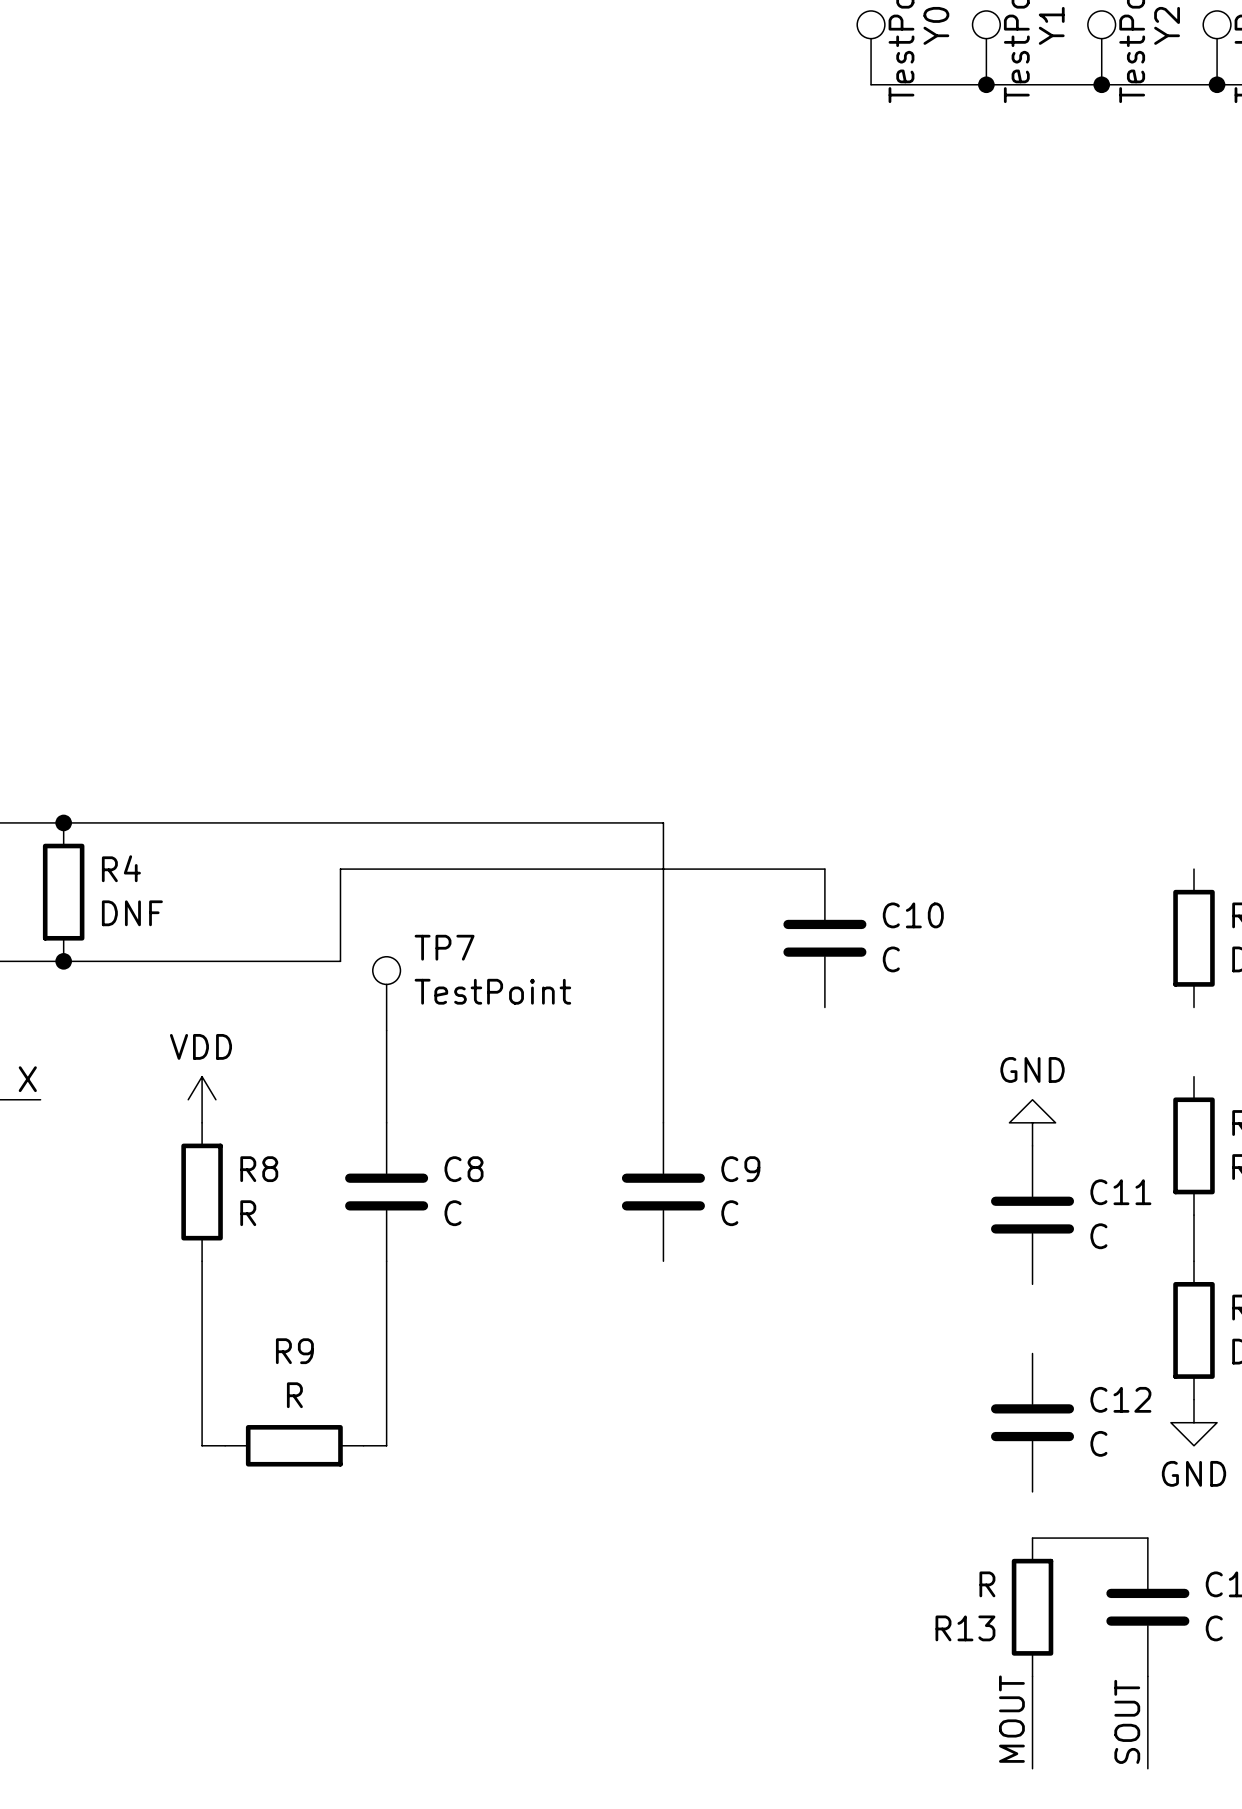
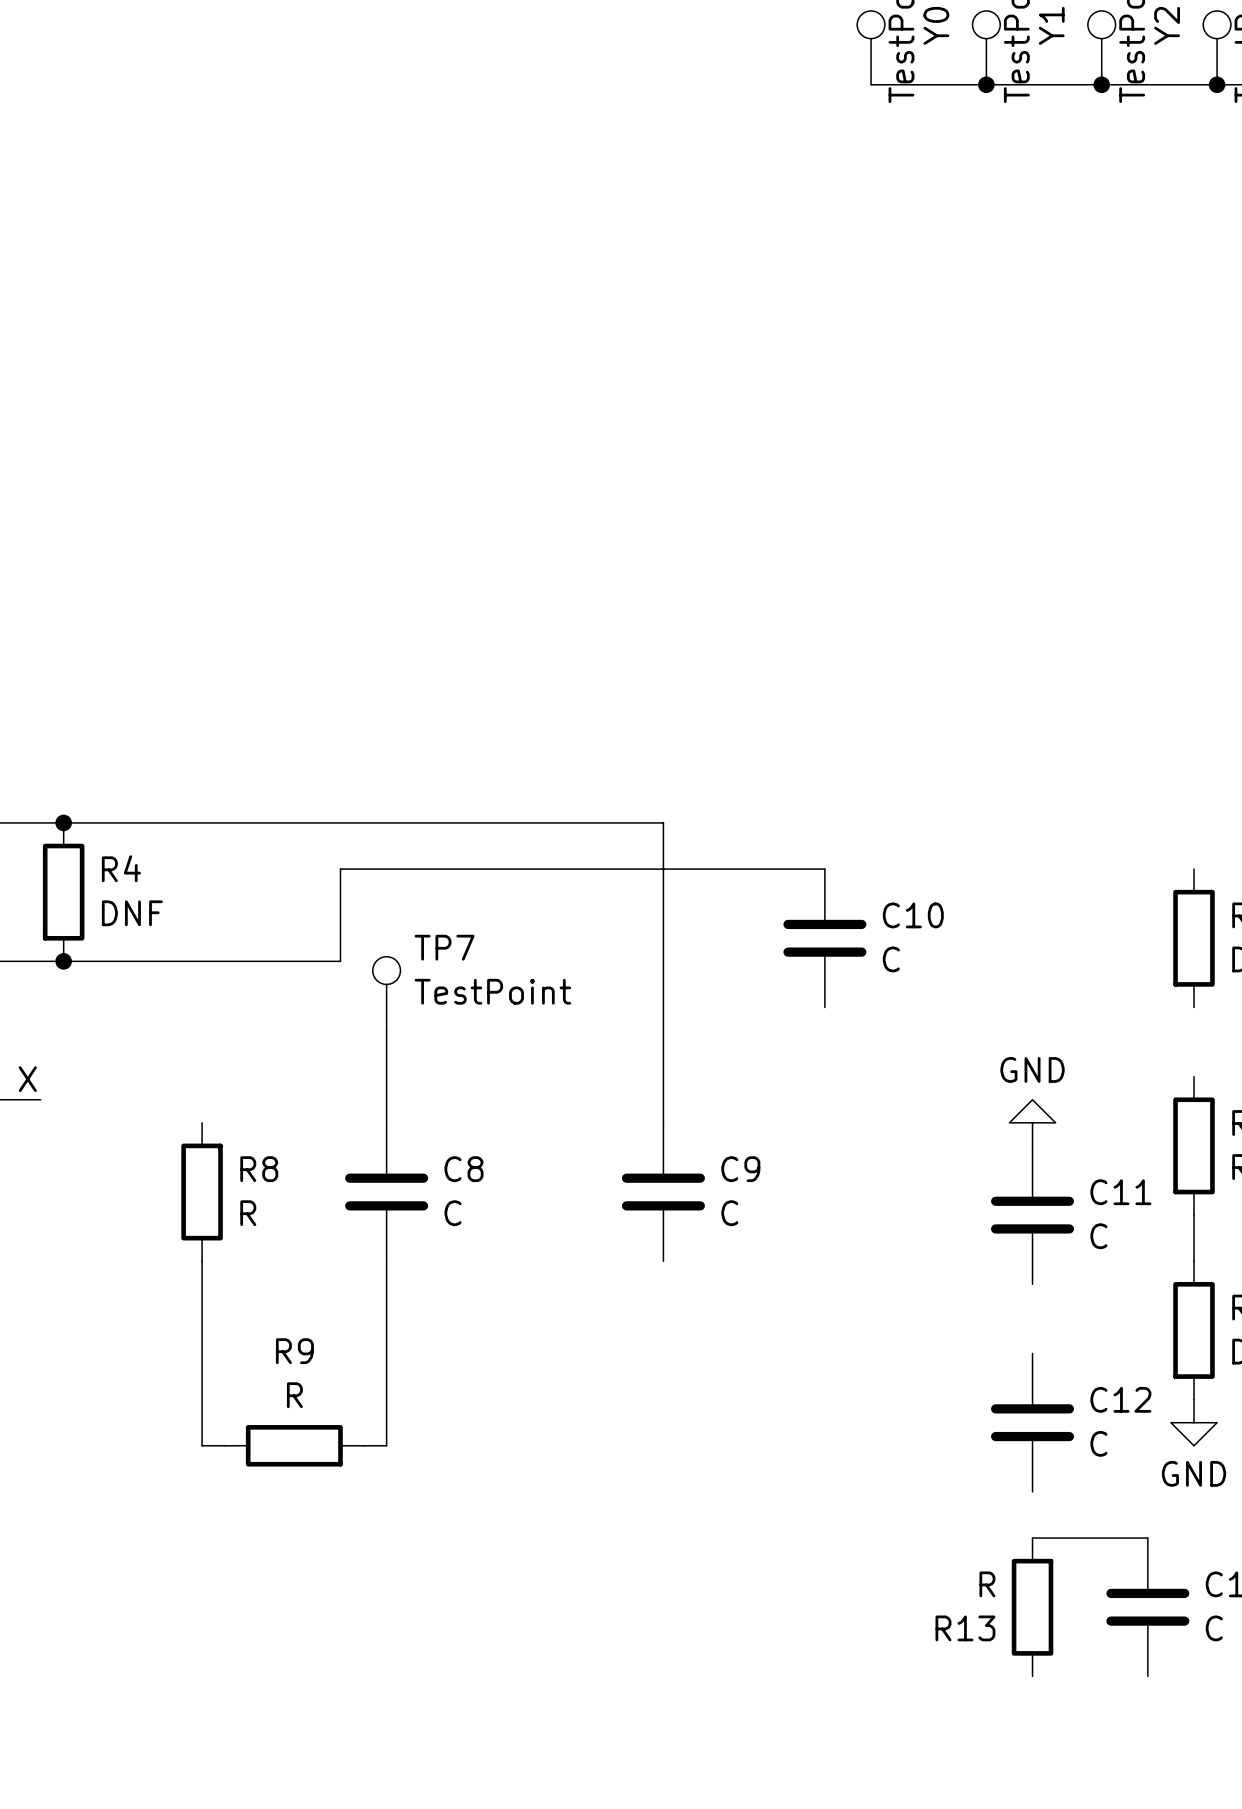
power symbol: VDD (202, 1099) -> none
wire: (1032, 1676) (1032, 1768) -> none
wire: (1147, 1676) (1147, 1768) -> none
label: MOUT (1011, 1719) -> none
label: SOUT (1127, 1721) -> none

